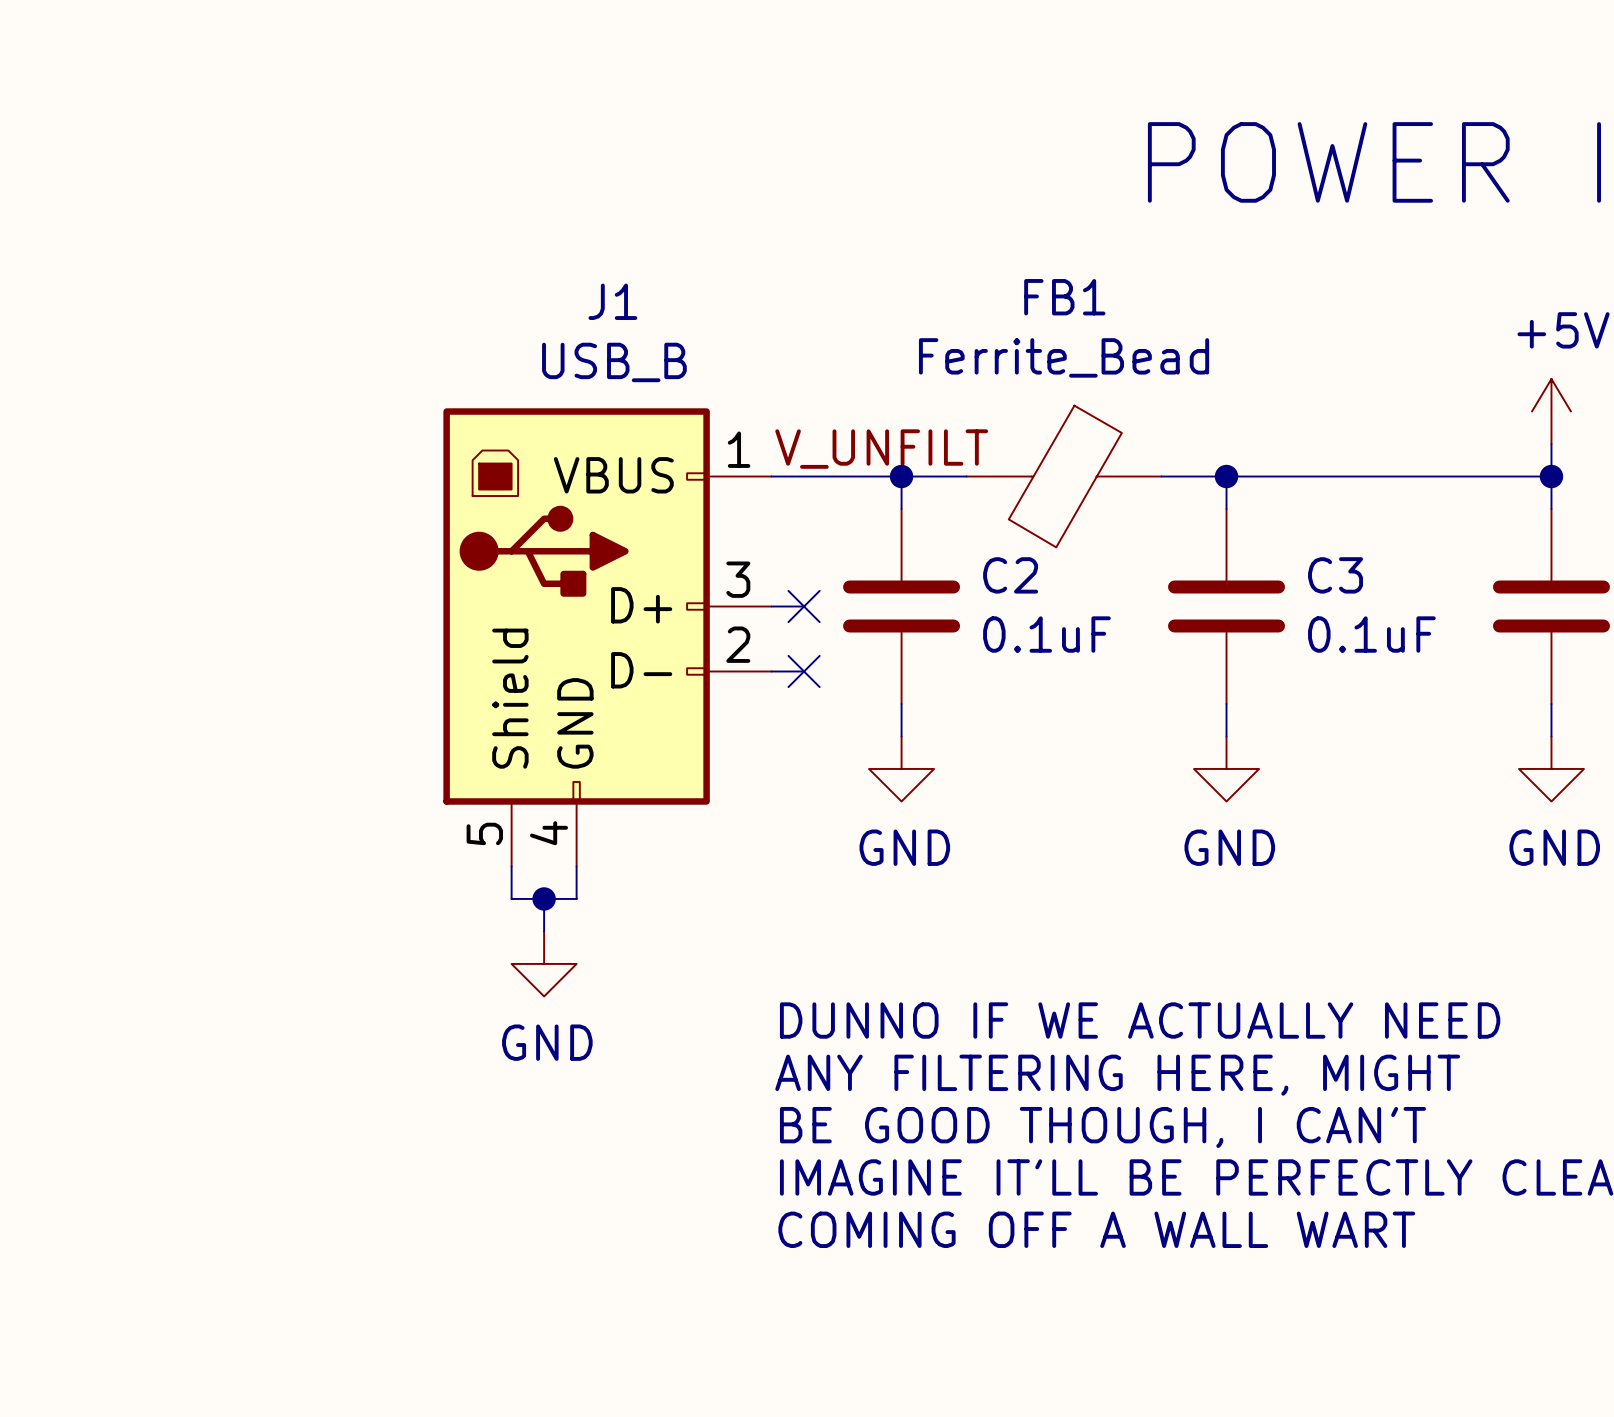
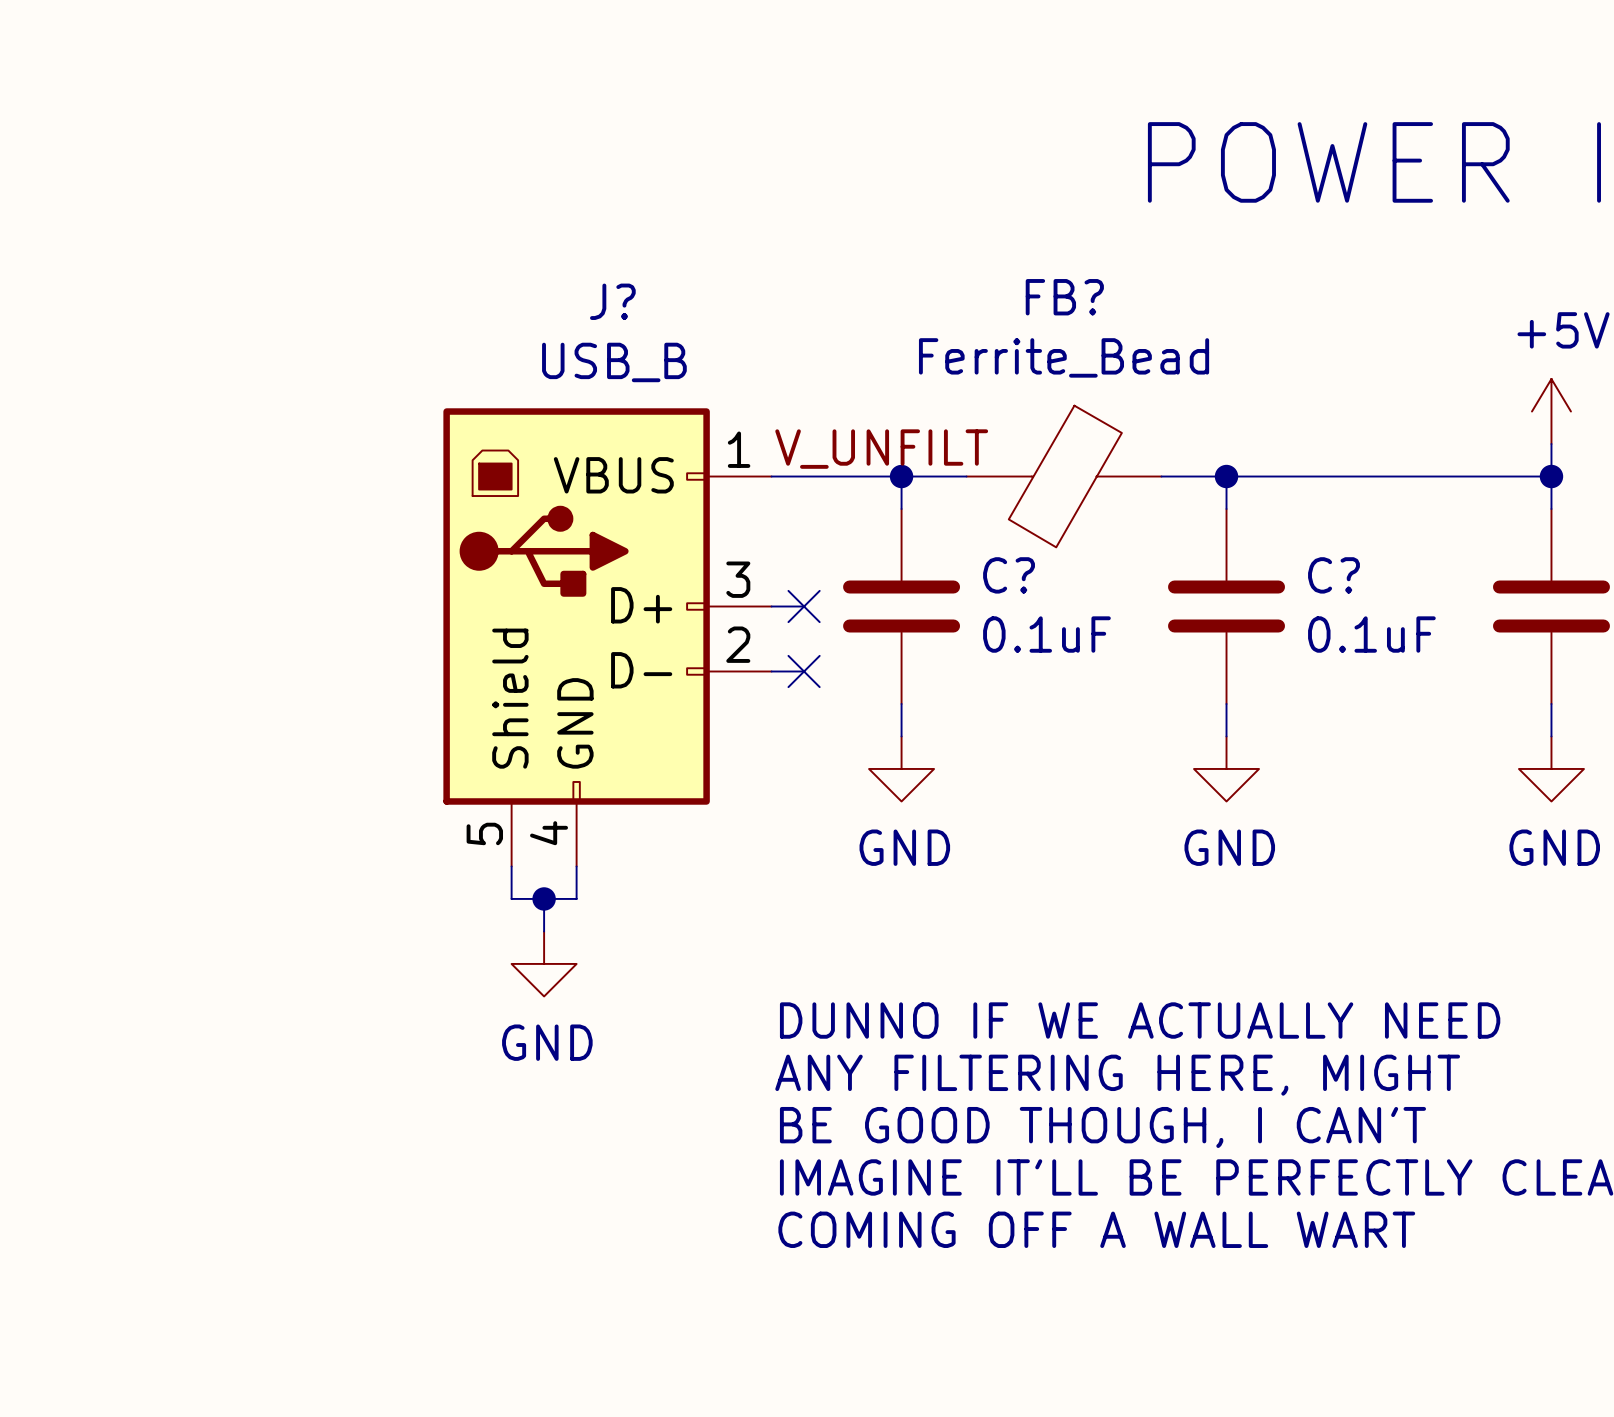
FB1 name: FB1 (1064, 297) -> FB? (1064, 297)
J1 name: J1 (612, 301) -> J? (612, 301)
C2 name: C2 (1010, 575) -> C? (1009, 575)
C3 name: C3 (1335, 575) -> C? (1333, 575)

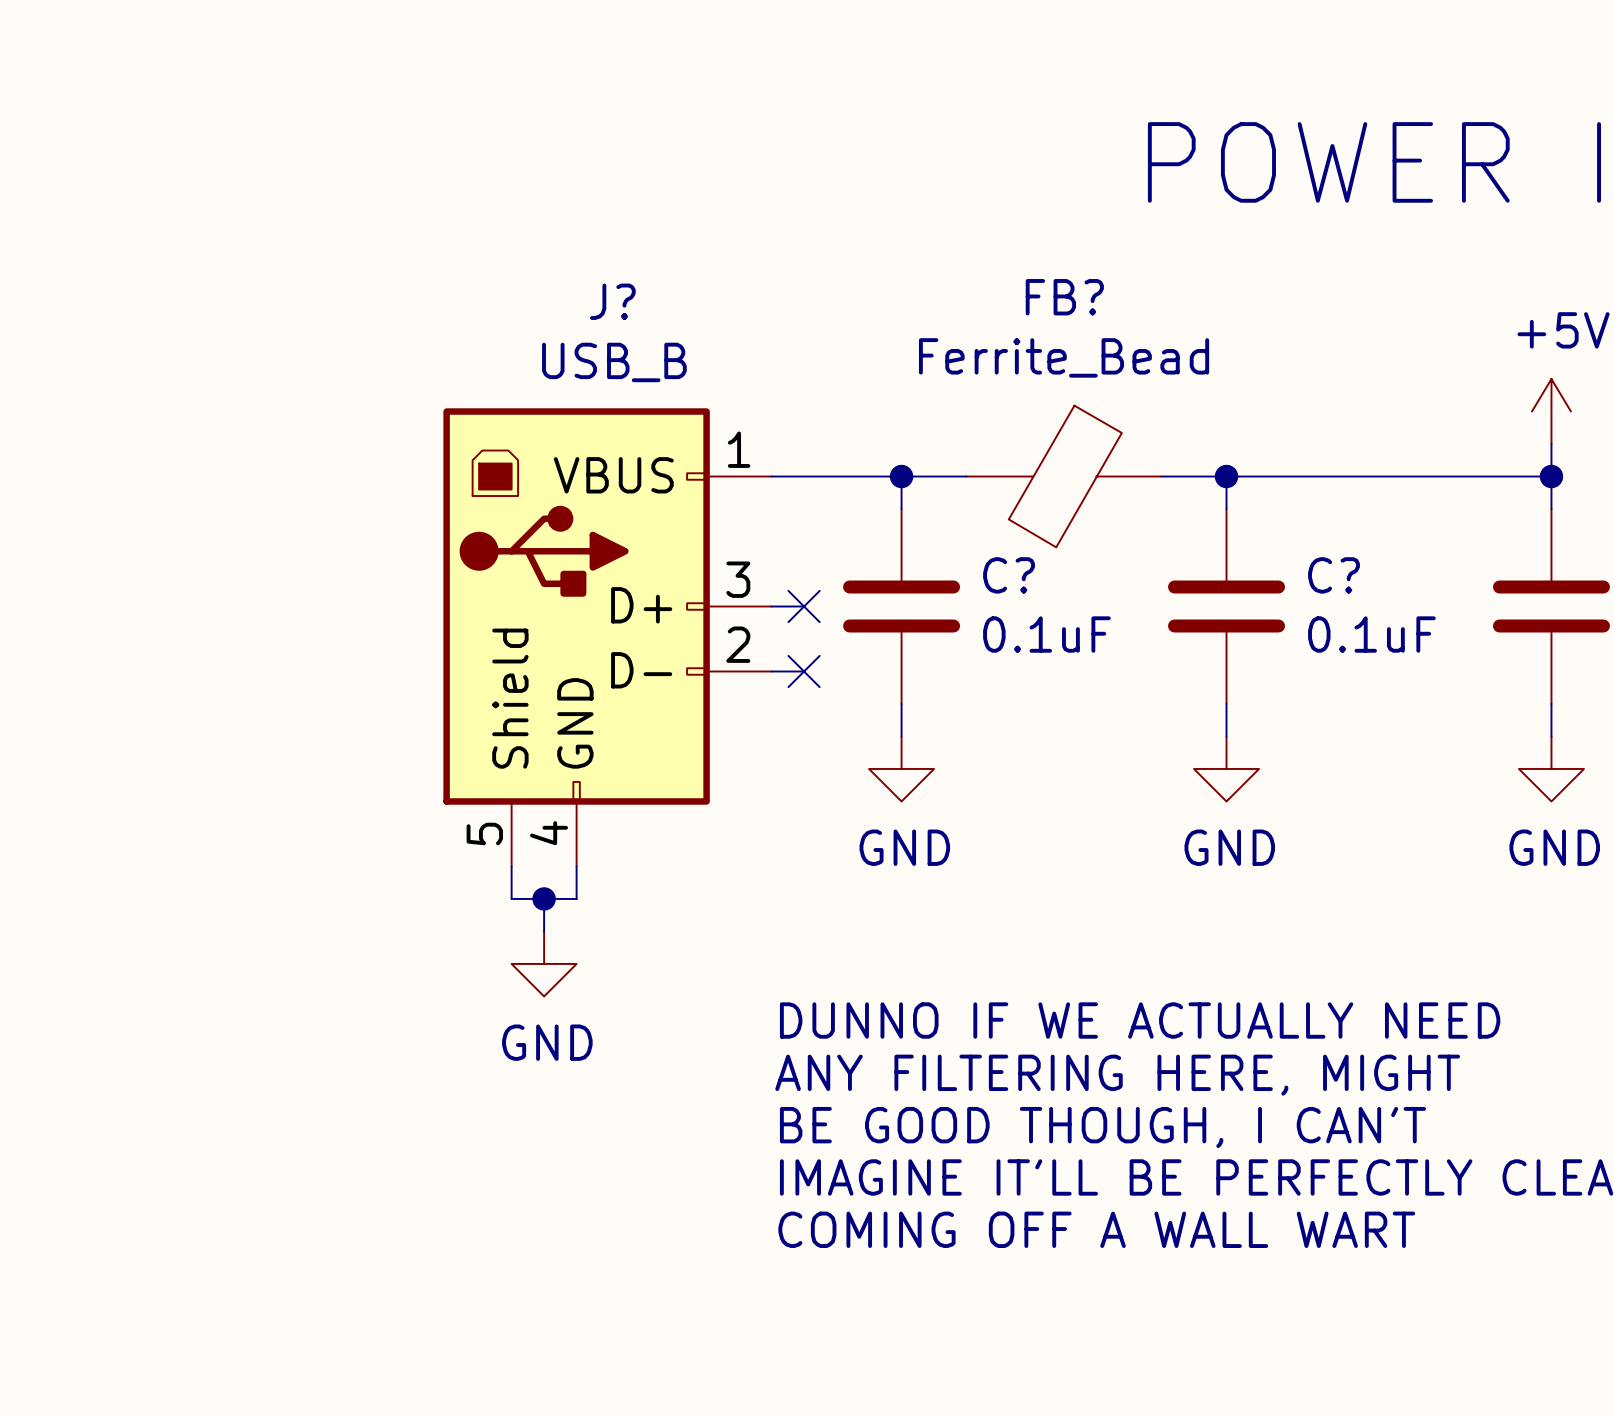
label: V_UNFILT (881, 449) -> none

